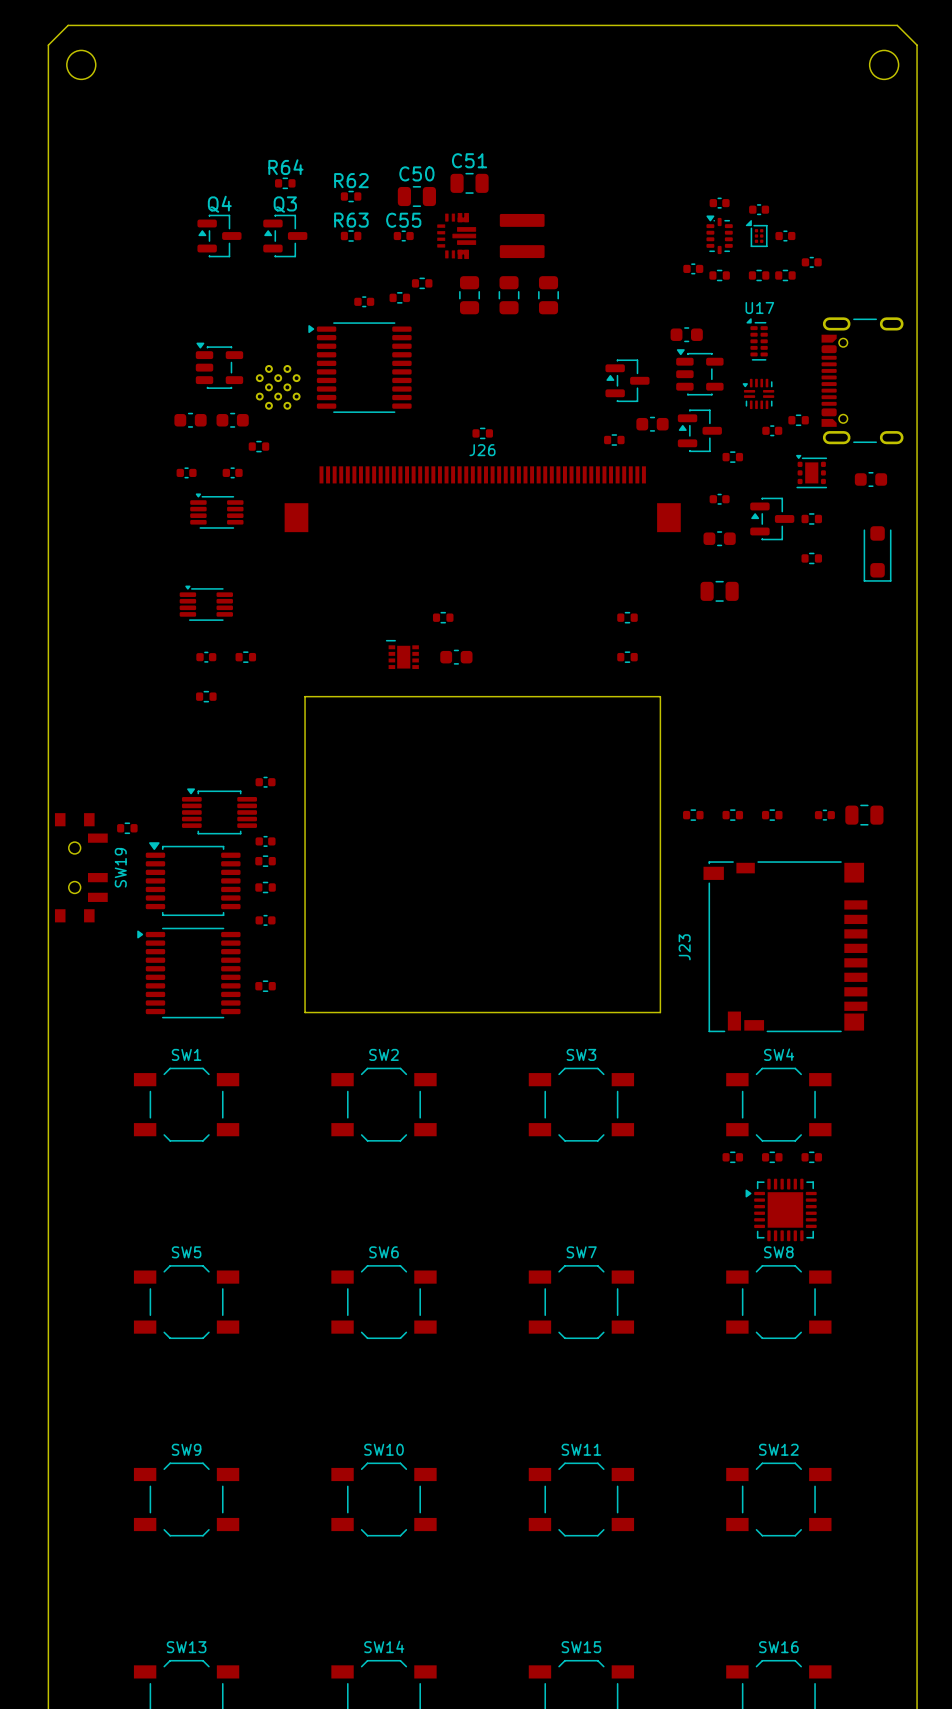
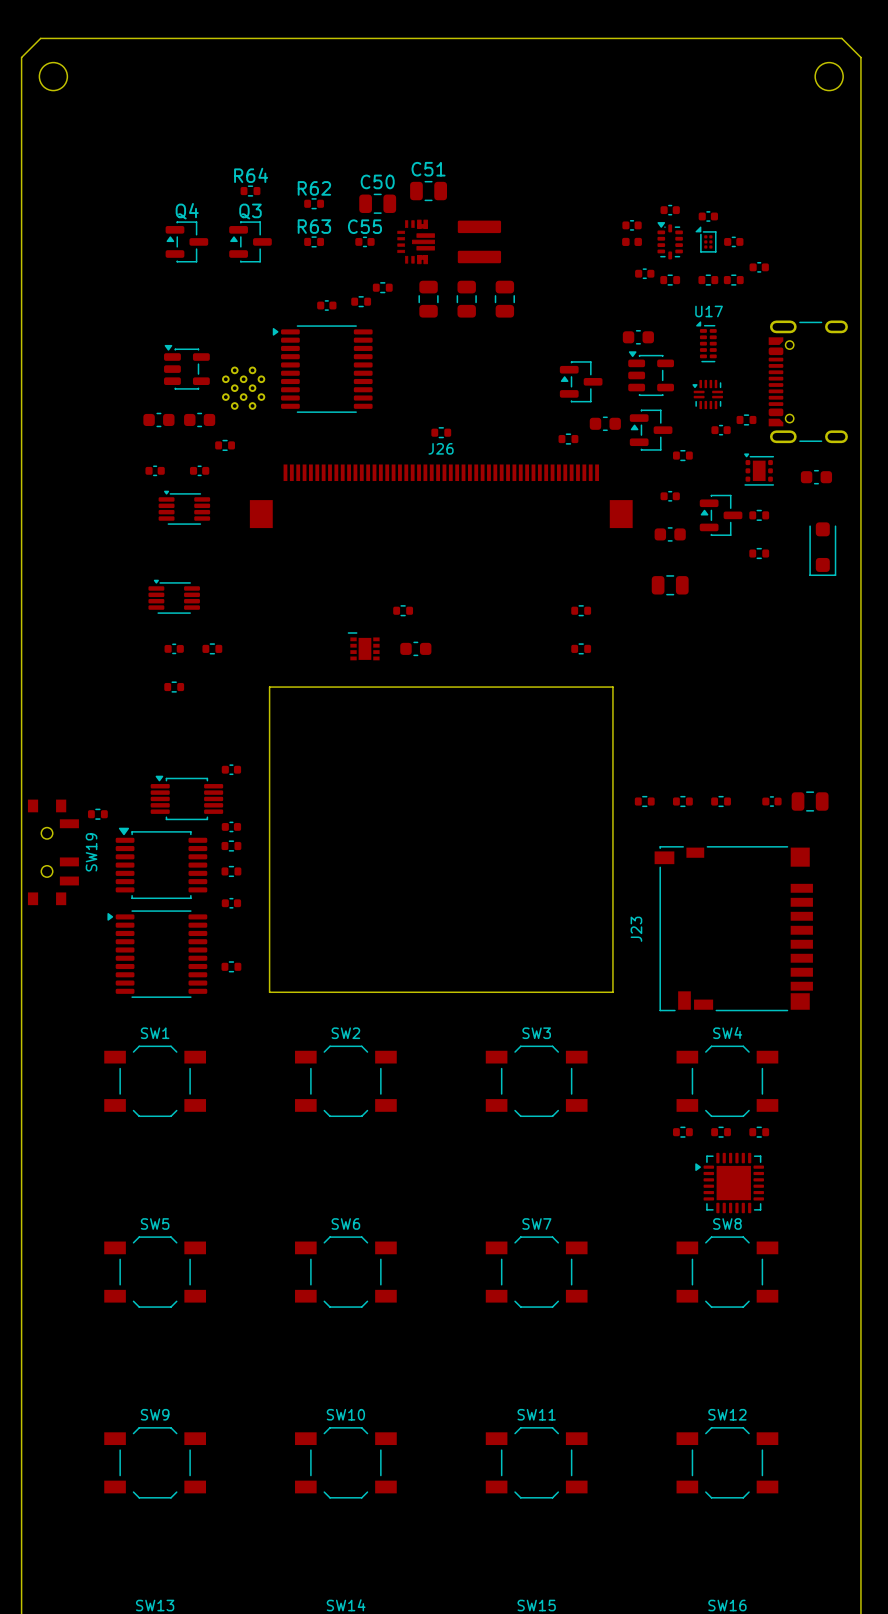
part: none -> (632, 225)
part: none -> (632, 241)

